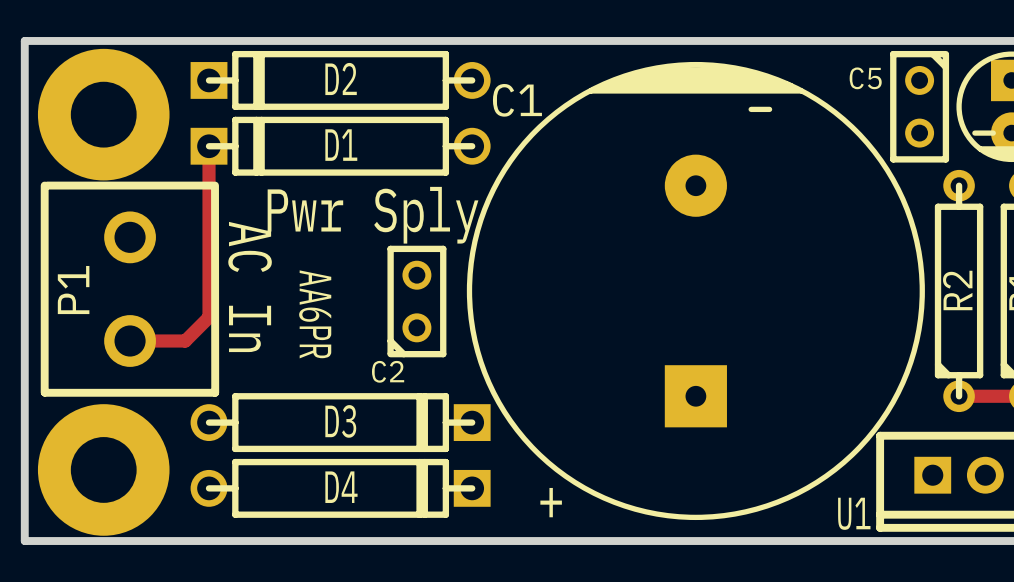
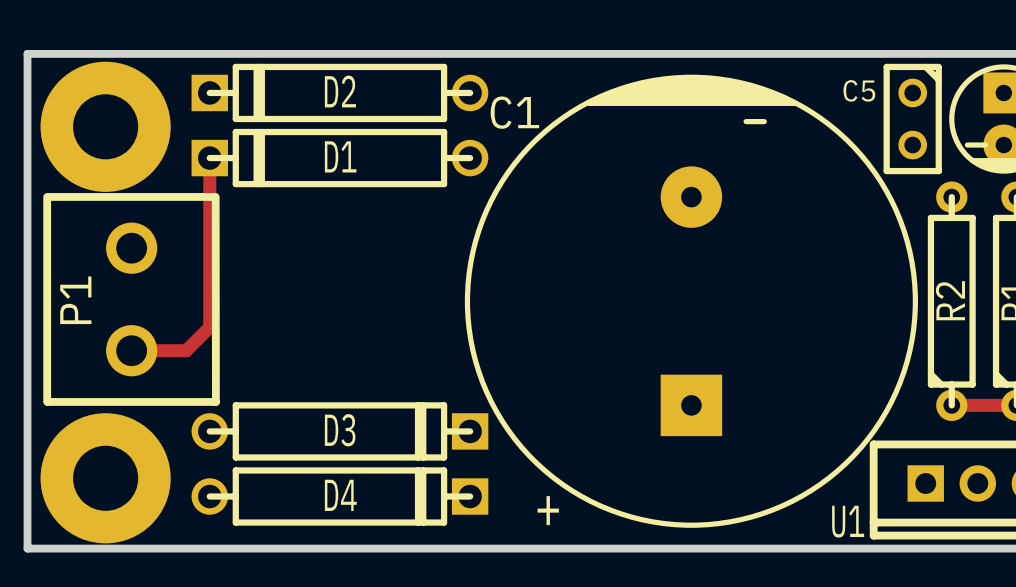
text: Pwr Sply (373, 215) -> none
text: AC In (250, 286) -> none
C2: (416, 301) -> none
text: AA6PR (315, 314) -> none

